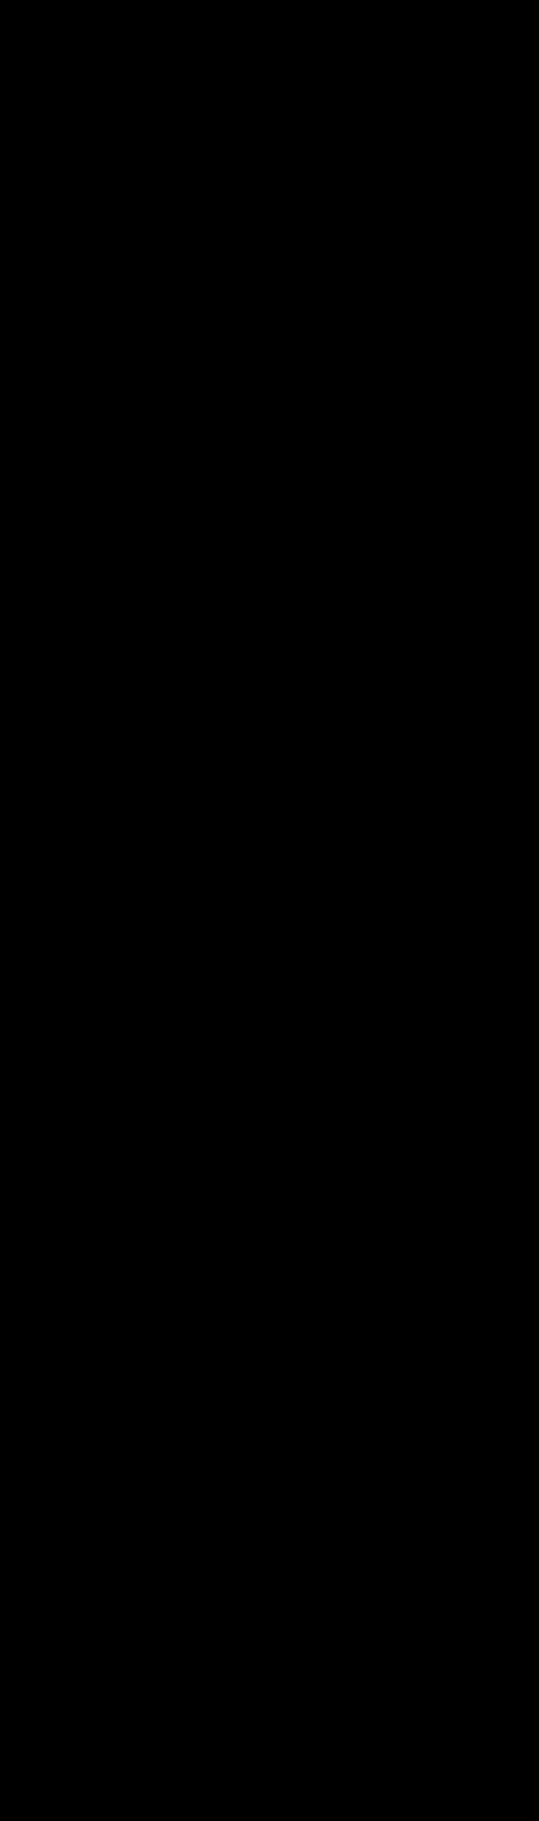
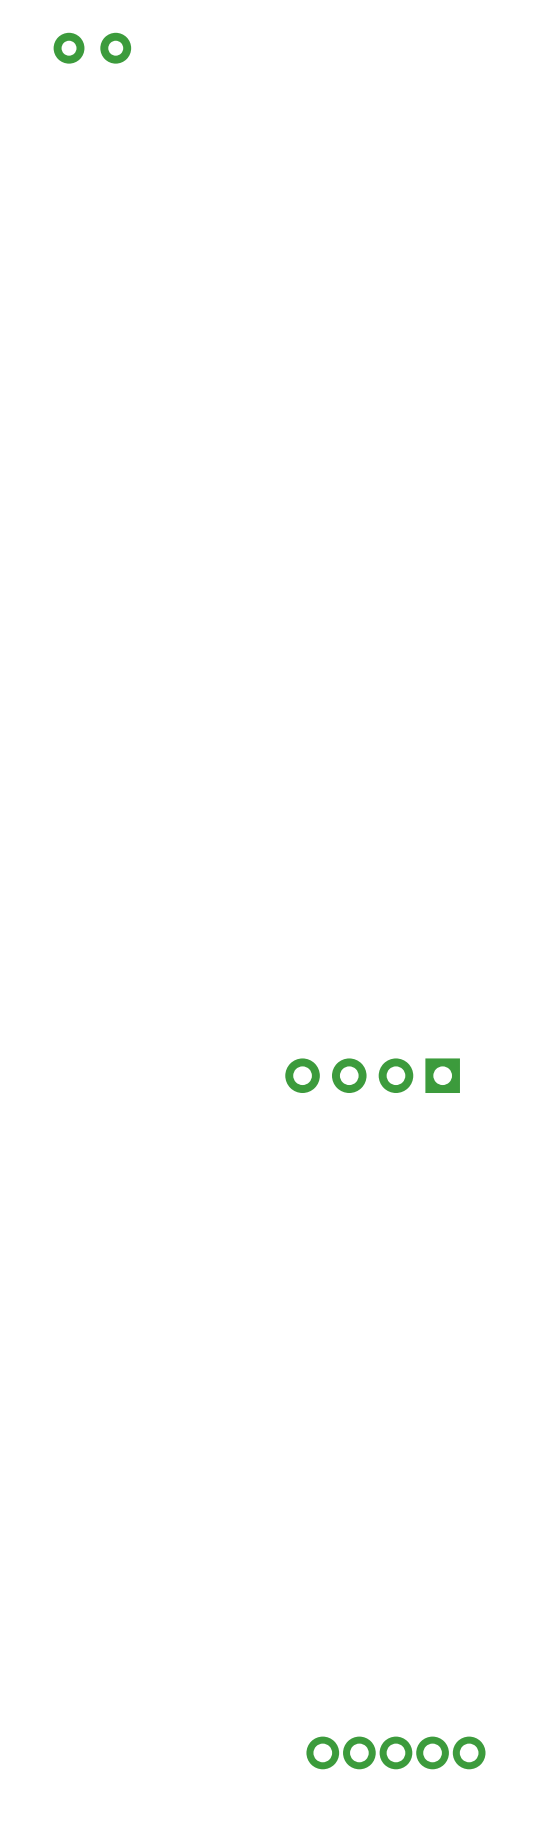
part: none -> (92, 48)
part: none -> (372, 1075)
part: none -> (395, 1752)

